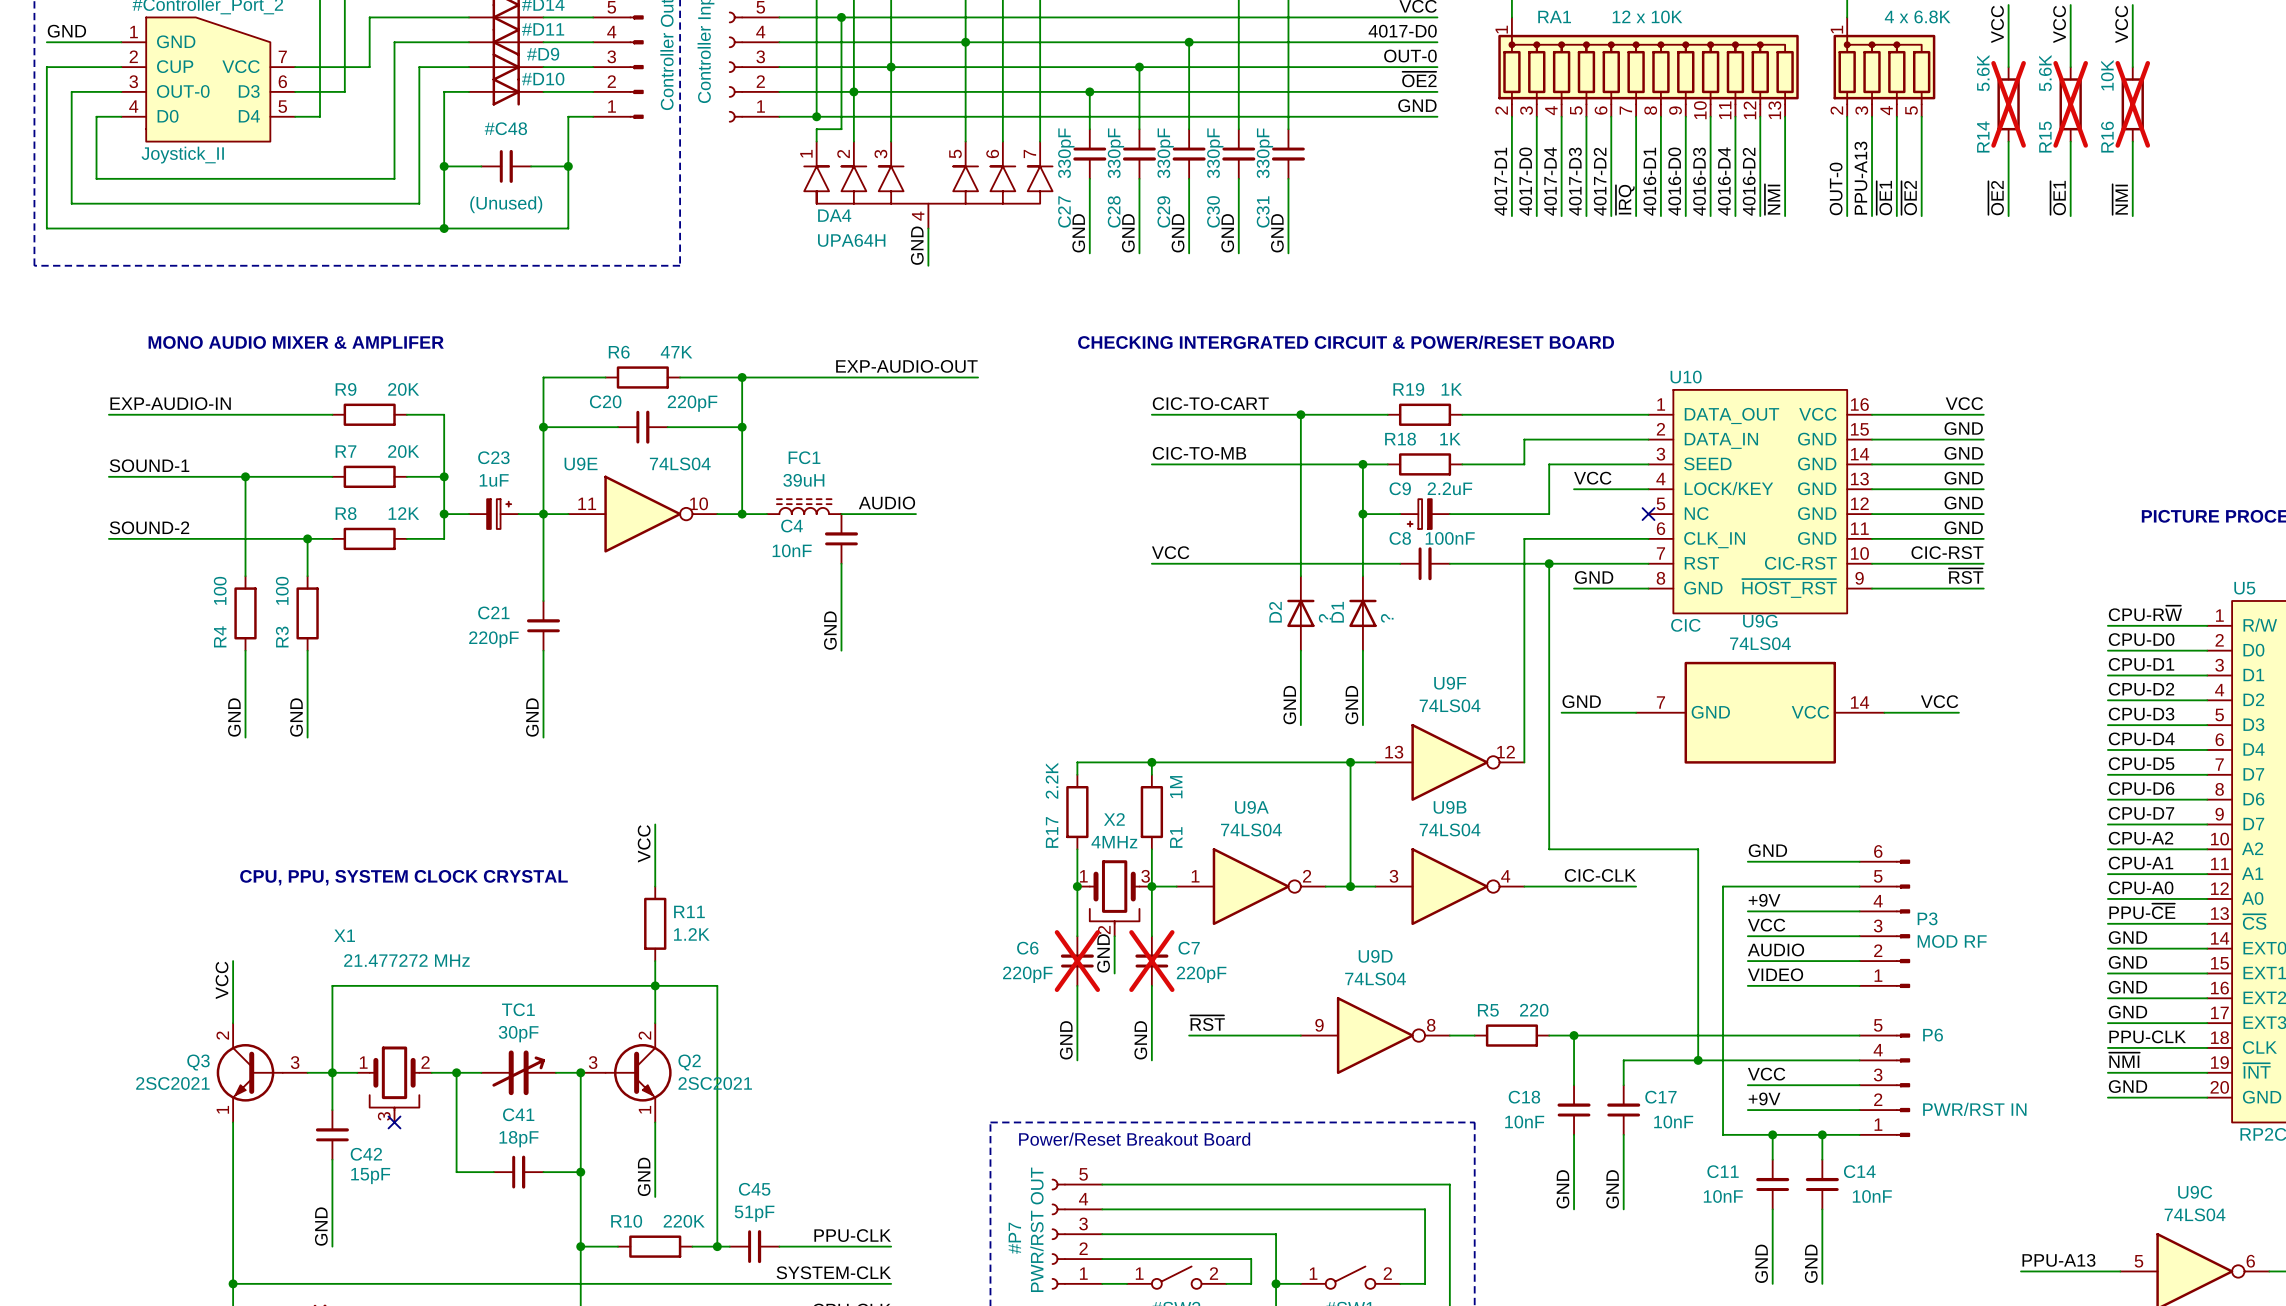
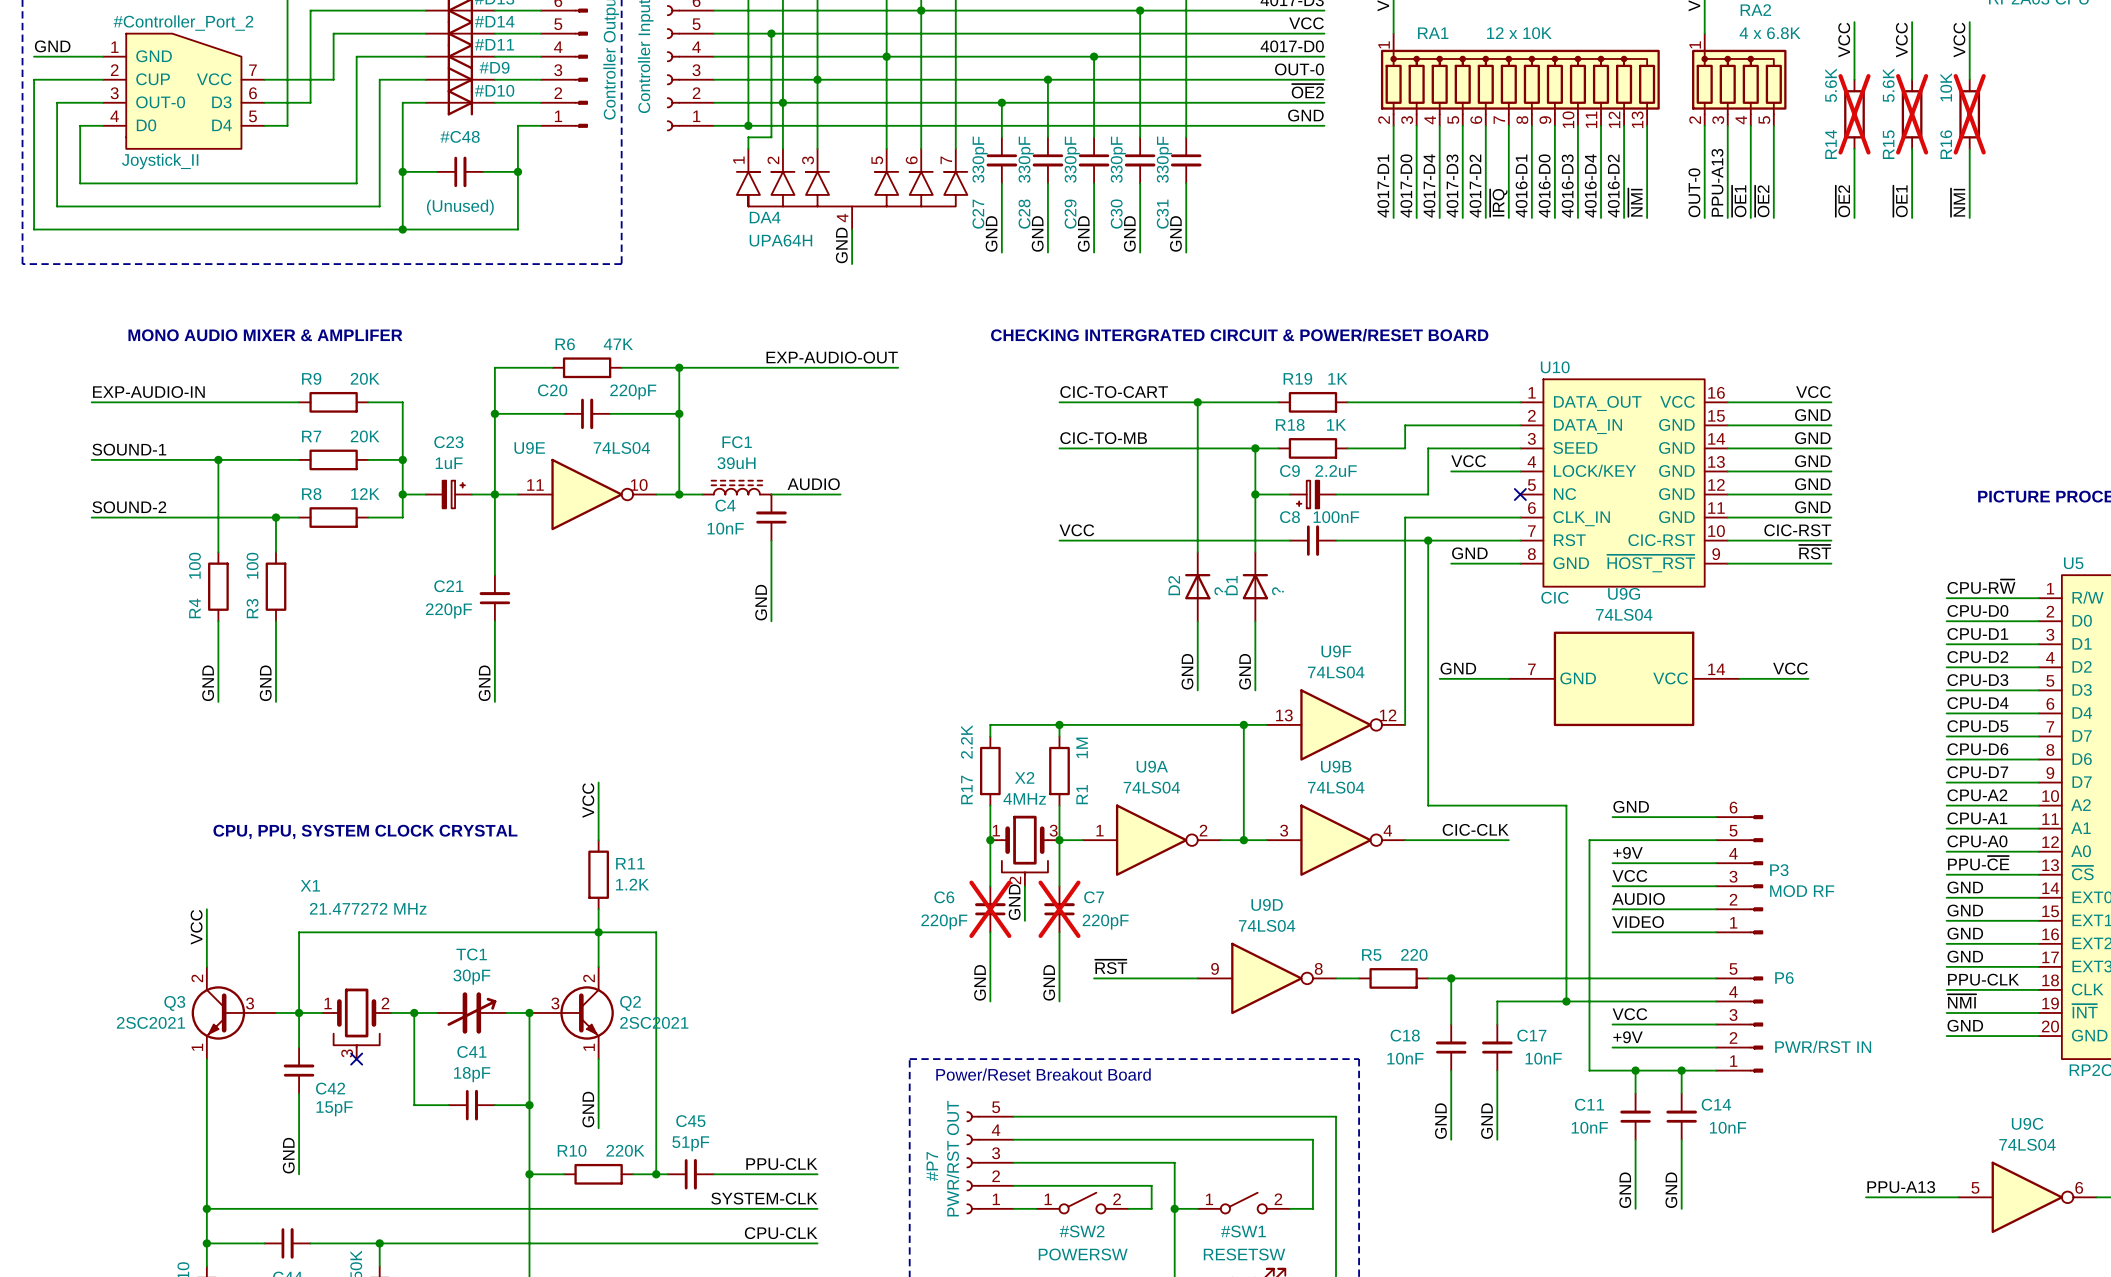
Q3 symbol: [216, 1023, 308, 1123] -> [191, 966, 277, 1060]
Q2 symbol: [580, 1023, 672, 1123] -> [529, 966, 614, 1060]

